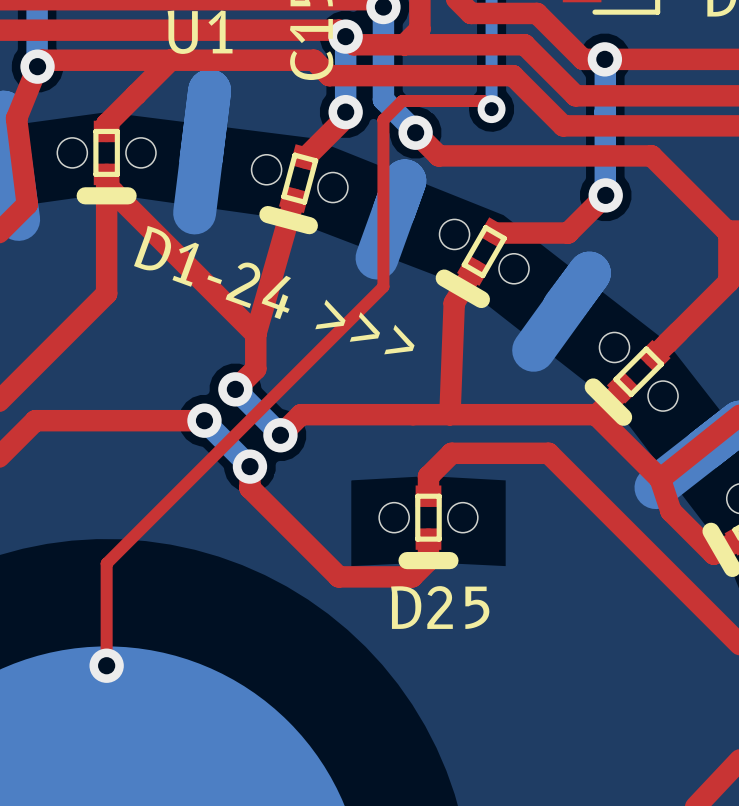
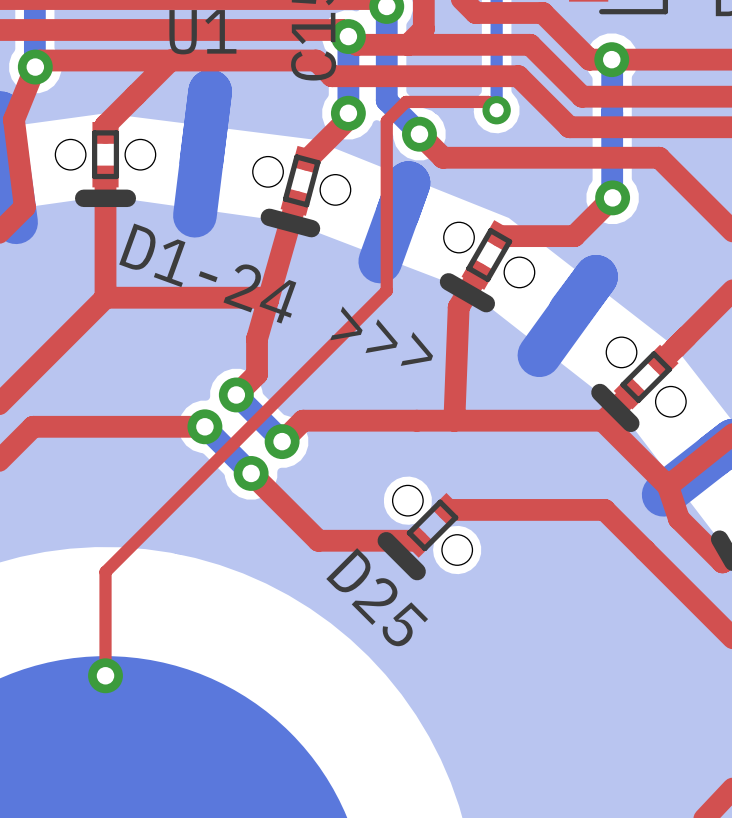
top track: (106, 174) (106, 185) (255, 334) -> none
top track: none -> (105, 297) (265, 297) (268, 299)
top track: (249, 466) (249, 488) (338, 576) (412, 576) (428, 560) (428, 539) -> (251, 473) (318, 540) (417, 540)
top track: (428, 496) (428, 476) (451, 453) (548, 453) (597, 502) -> (447, 509) (604, 509)
D25 rotation: 0° (428, 527) -> 45° clockwise (425, 532)

